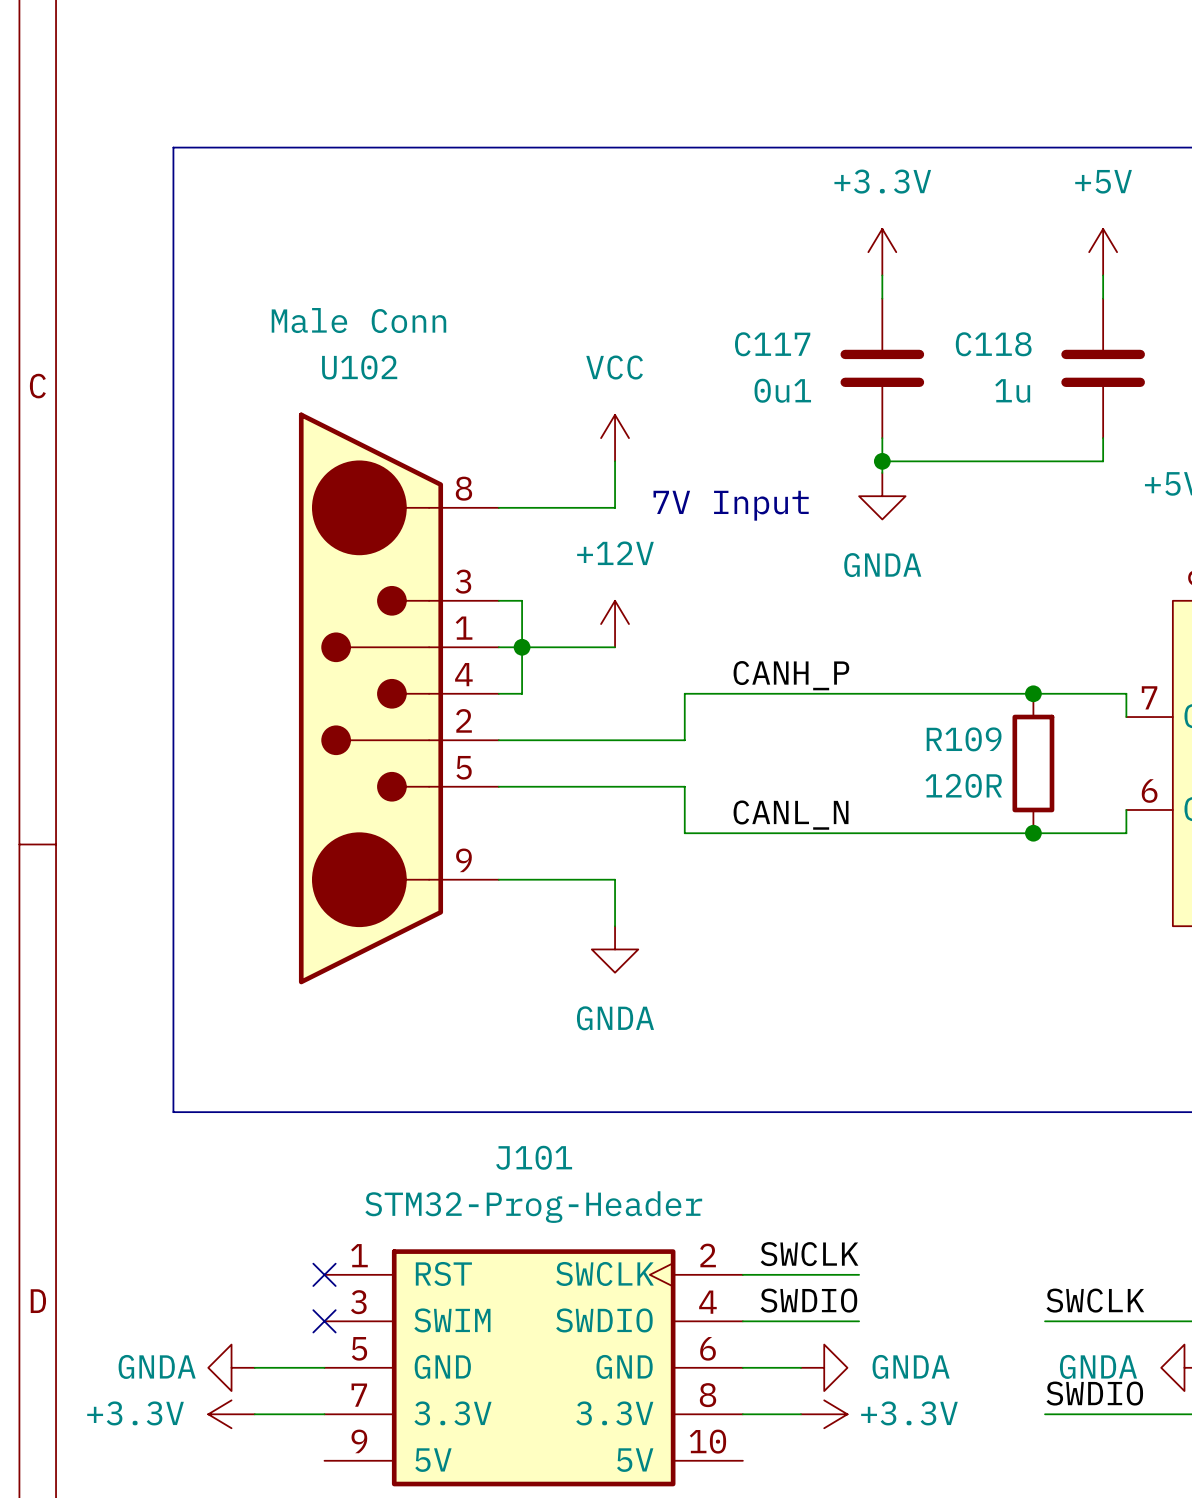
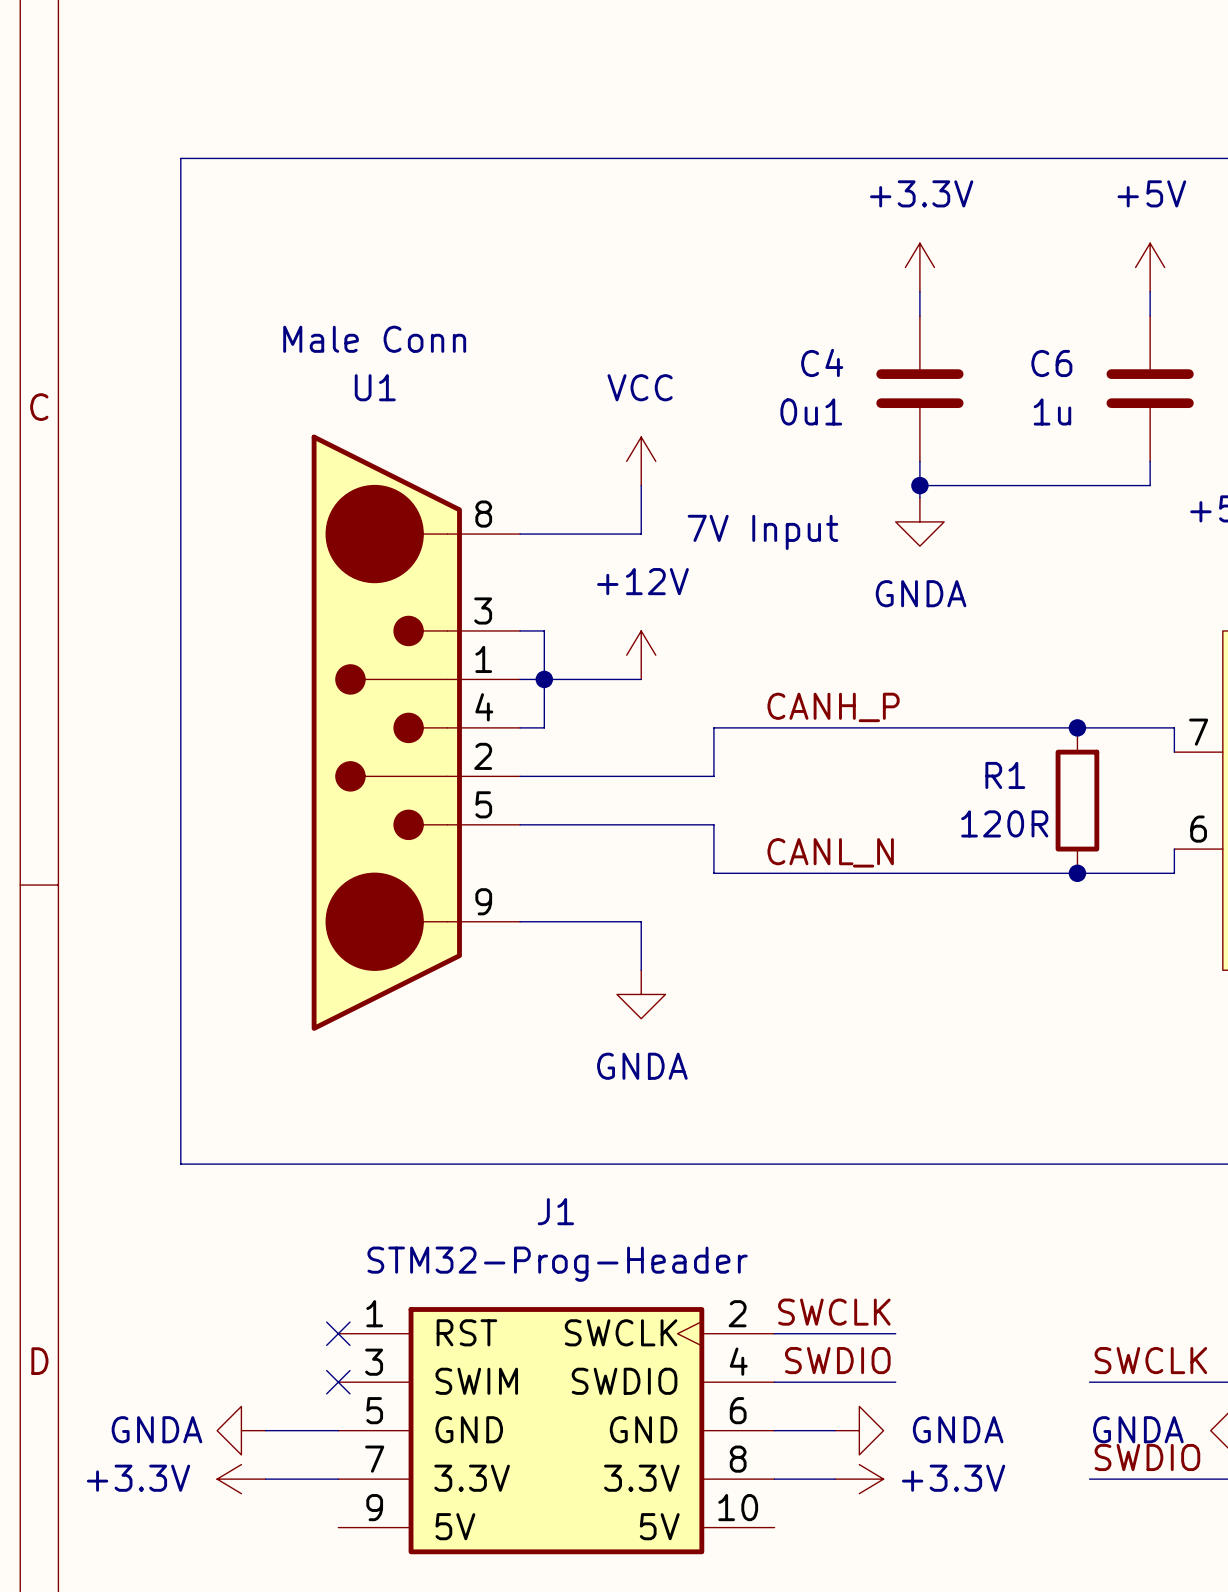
C117 name: C117 (772, 344) -> C4 (822, 362)
C118 name: C118 (993, 344) -> C6 (1051, 363)
U102 name: U102 (359, 367) -> U1 (375, 387)
R109 name: R109 (964, 739) -> R1 (1005, 775)
J101 name: J101 (534, 1157) -> J1 (555, 1211)

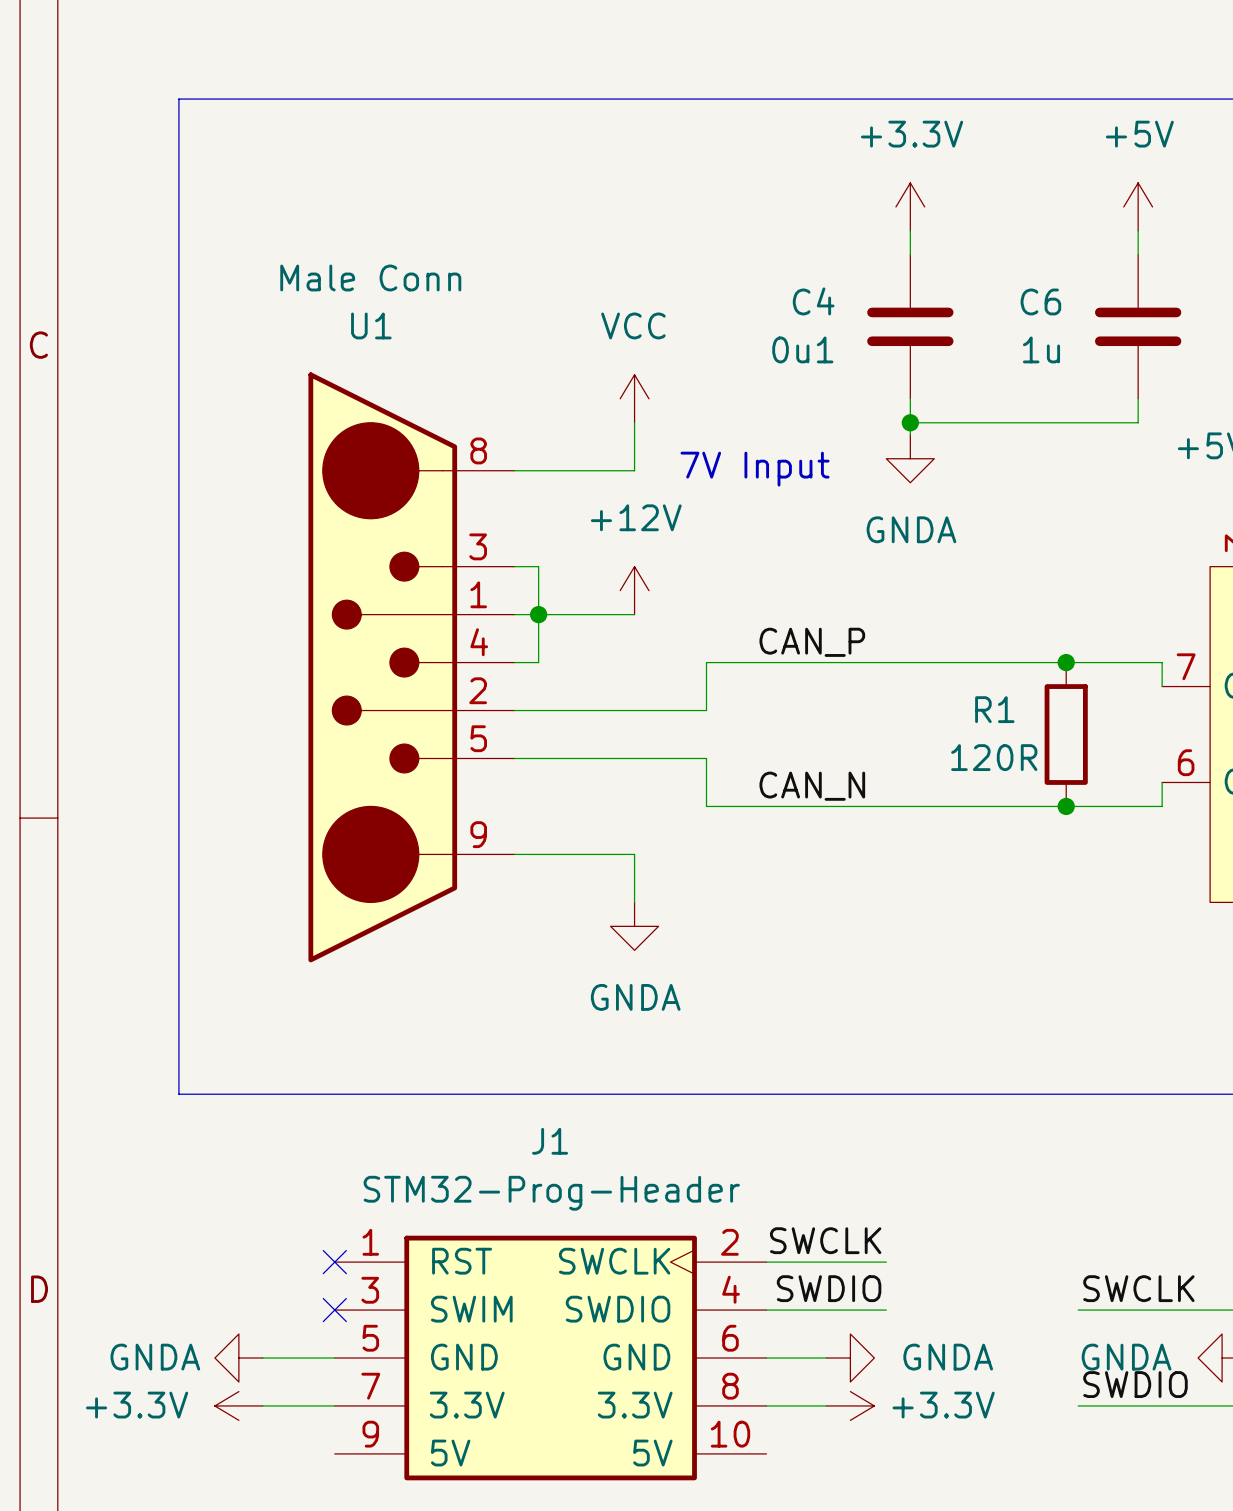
label: CANH_P (833, 707) -> CAN_P (812, 642)
label: CANL_N (830, 852) -> CAN_N (812, 786)

